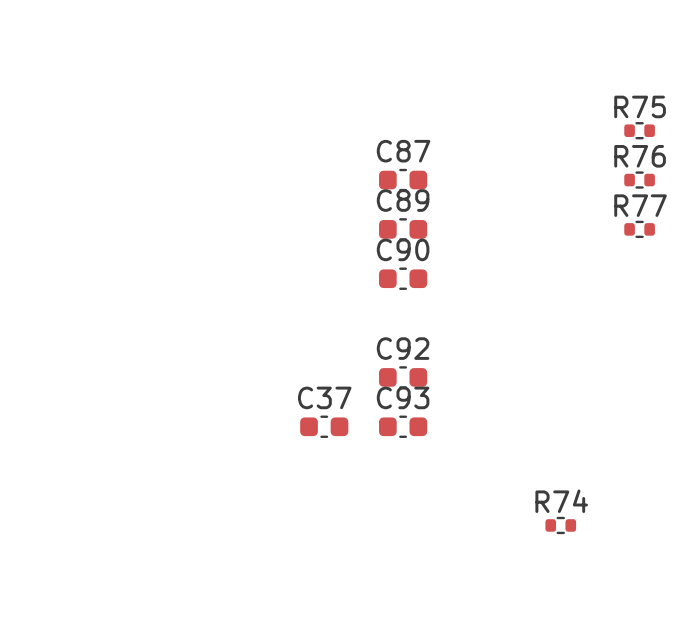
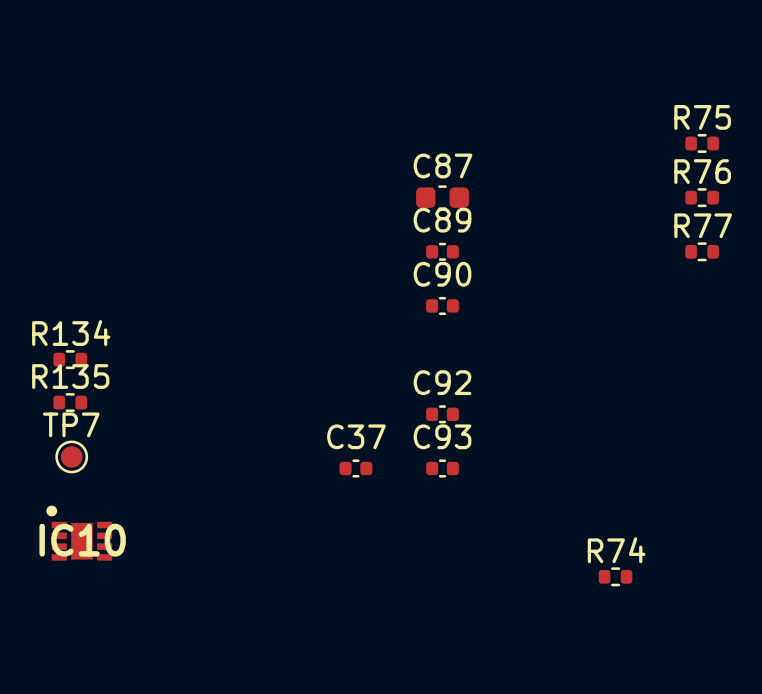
C89 footprint: [379, 218, 428, 241] -> [426, 242, 459, 261]
C90 footprint: [379, 267, 428, 290] -> [426, 296, 459, 316]
R134: none -> (70, 359)
R135: none -> (70, 402)
C92 footprint: [379, 366, 428, 389] -> [426, 405, 459, 424]
C37 footprint: [300, 415, 349, 438] -> [339, 459, 373, 478]
C93 footprint: [379, 415, 428, 438] -> [426, 459, 459, 478]
TP7: none -> (71, 456)
IC10: none -> (79, 533)

